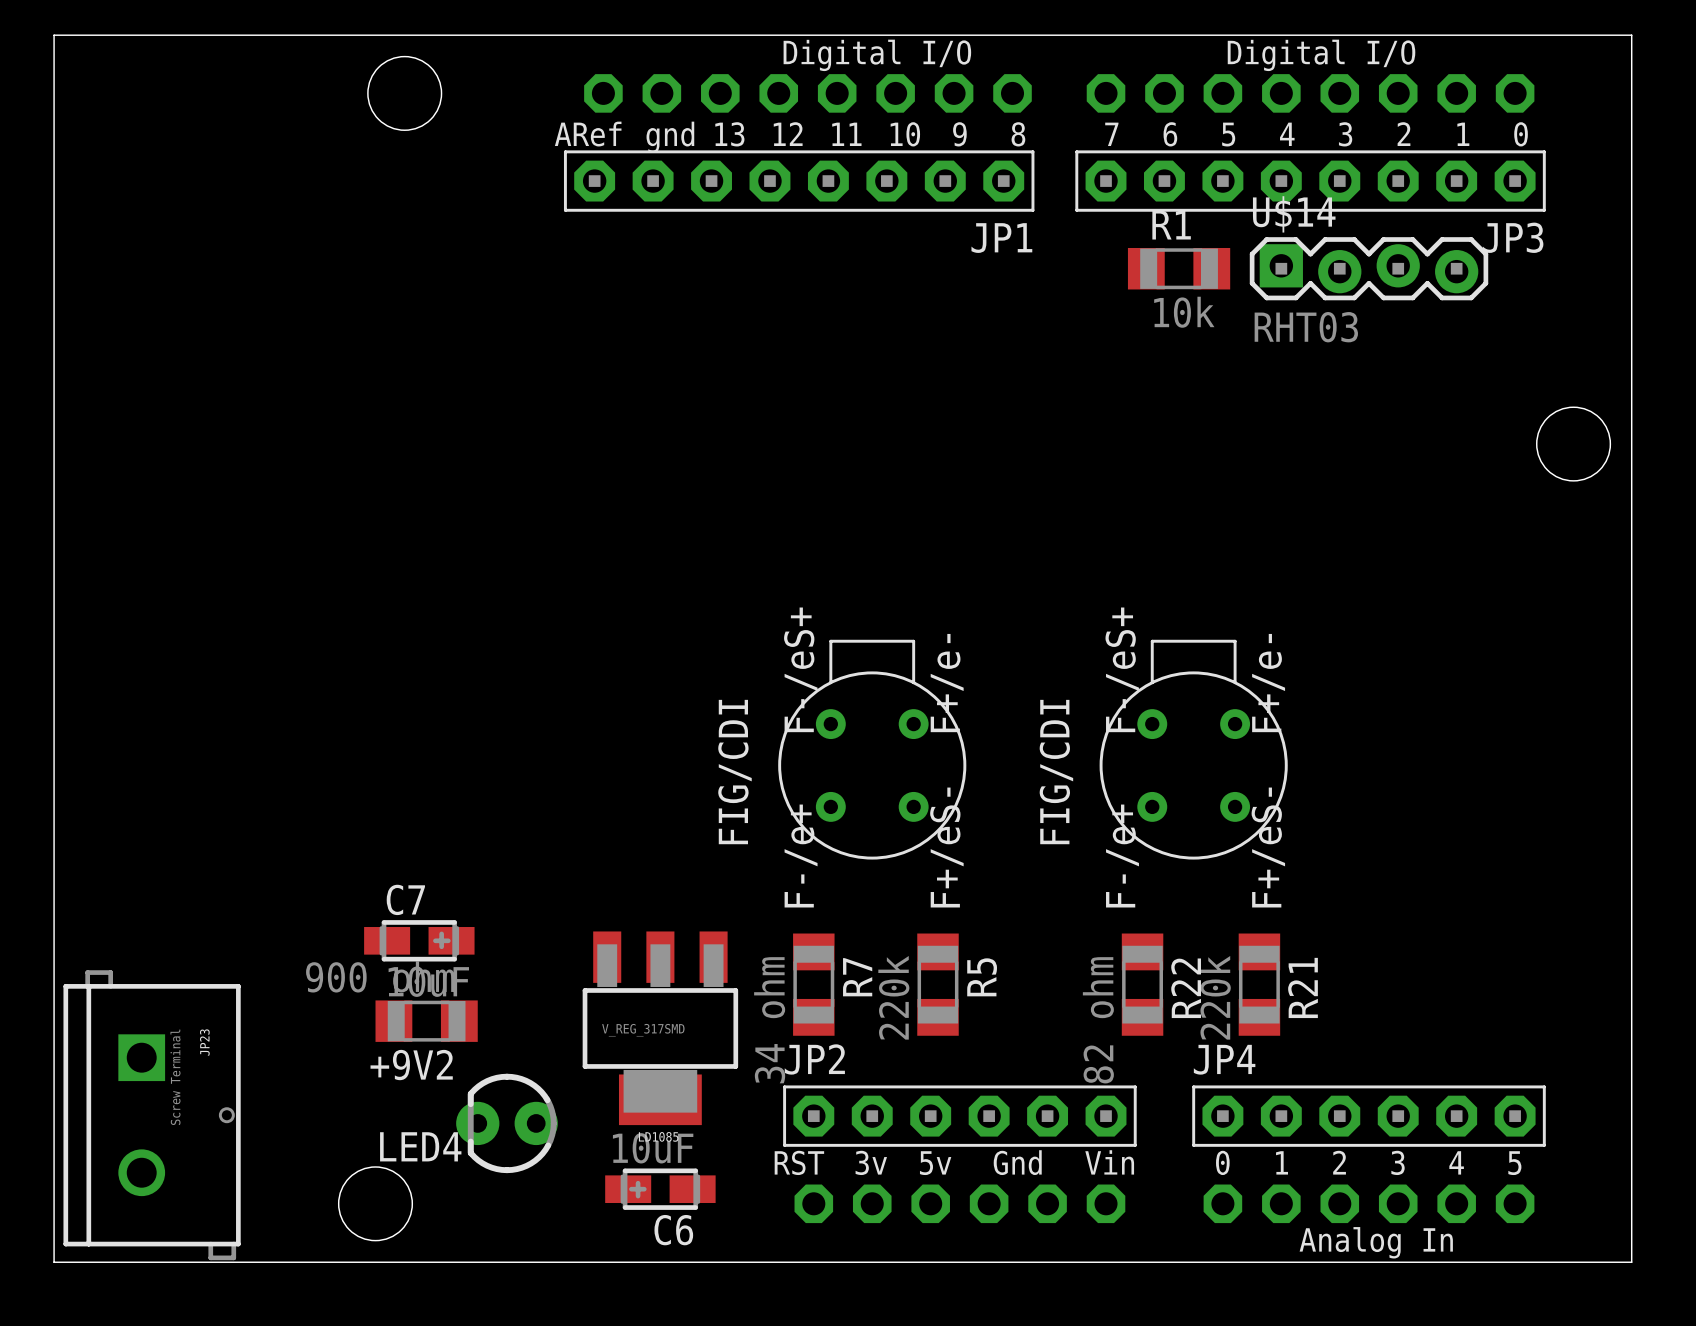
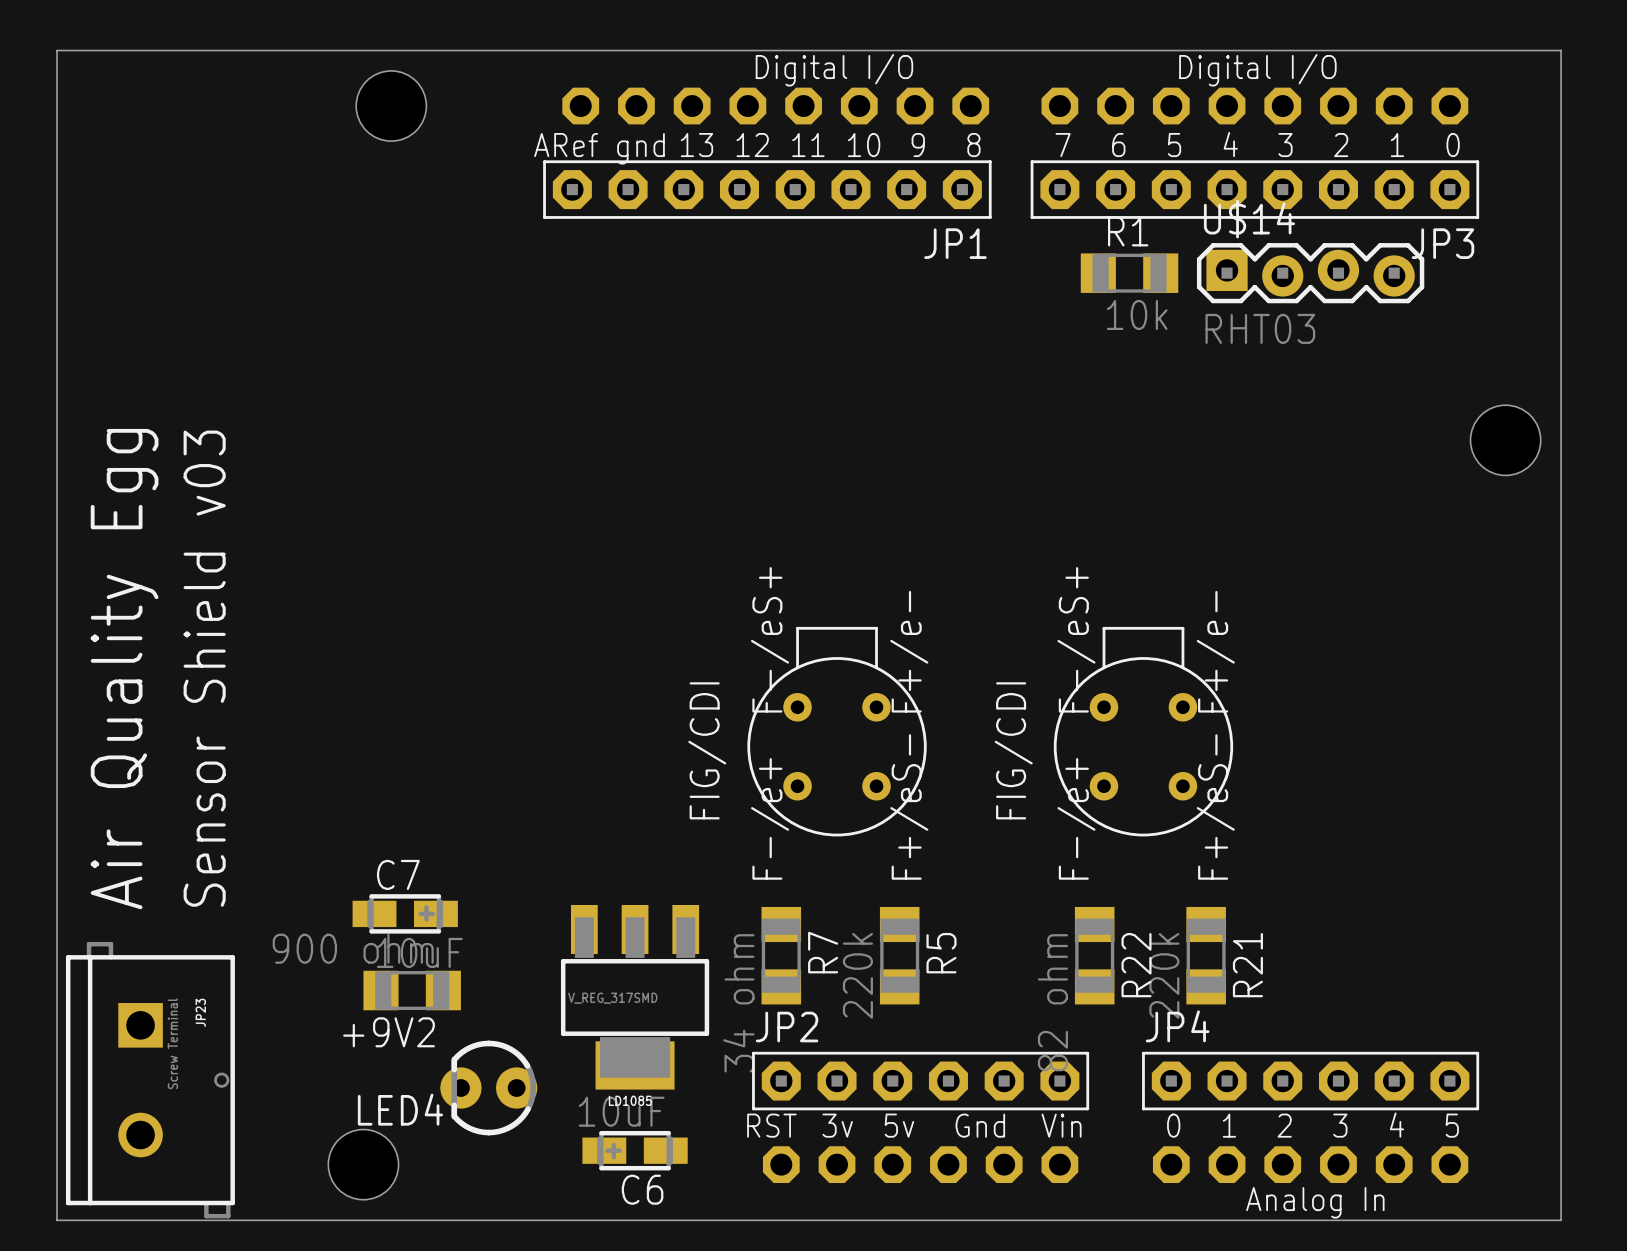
text: none -> Air Quality Egg (124, 669)
text: none -> Sensor Shield v03 (204, 668)

